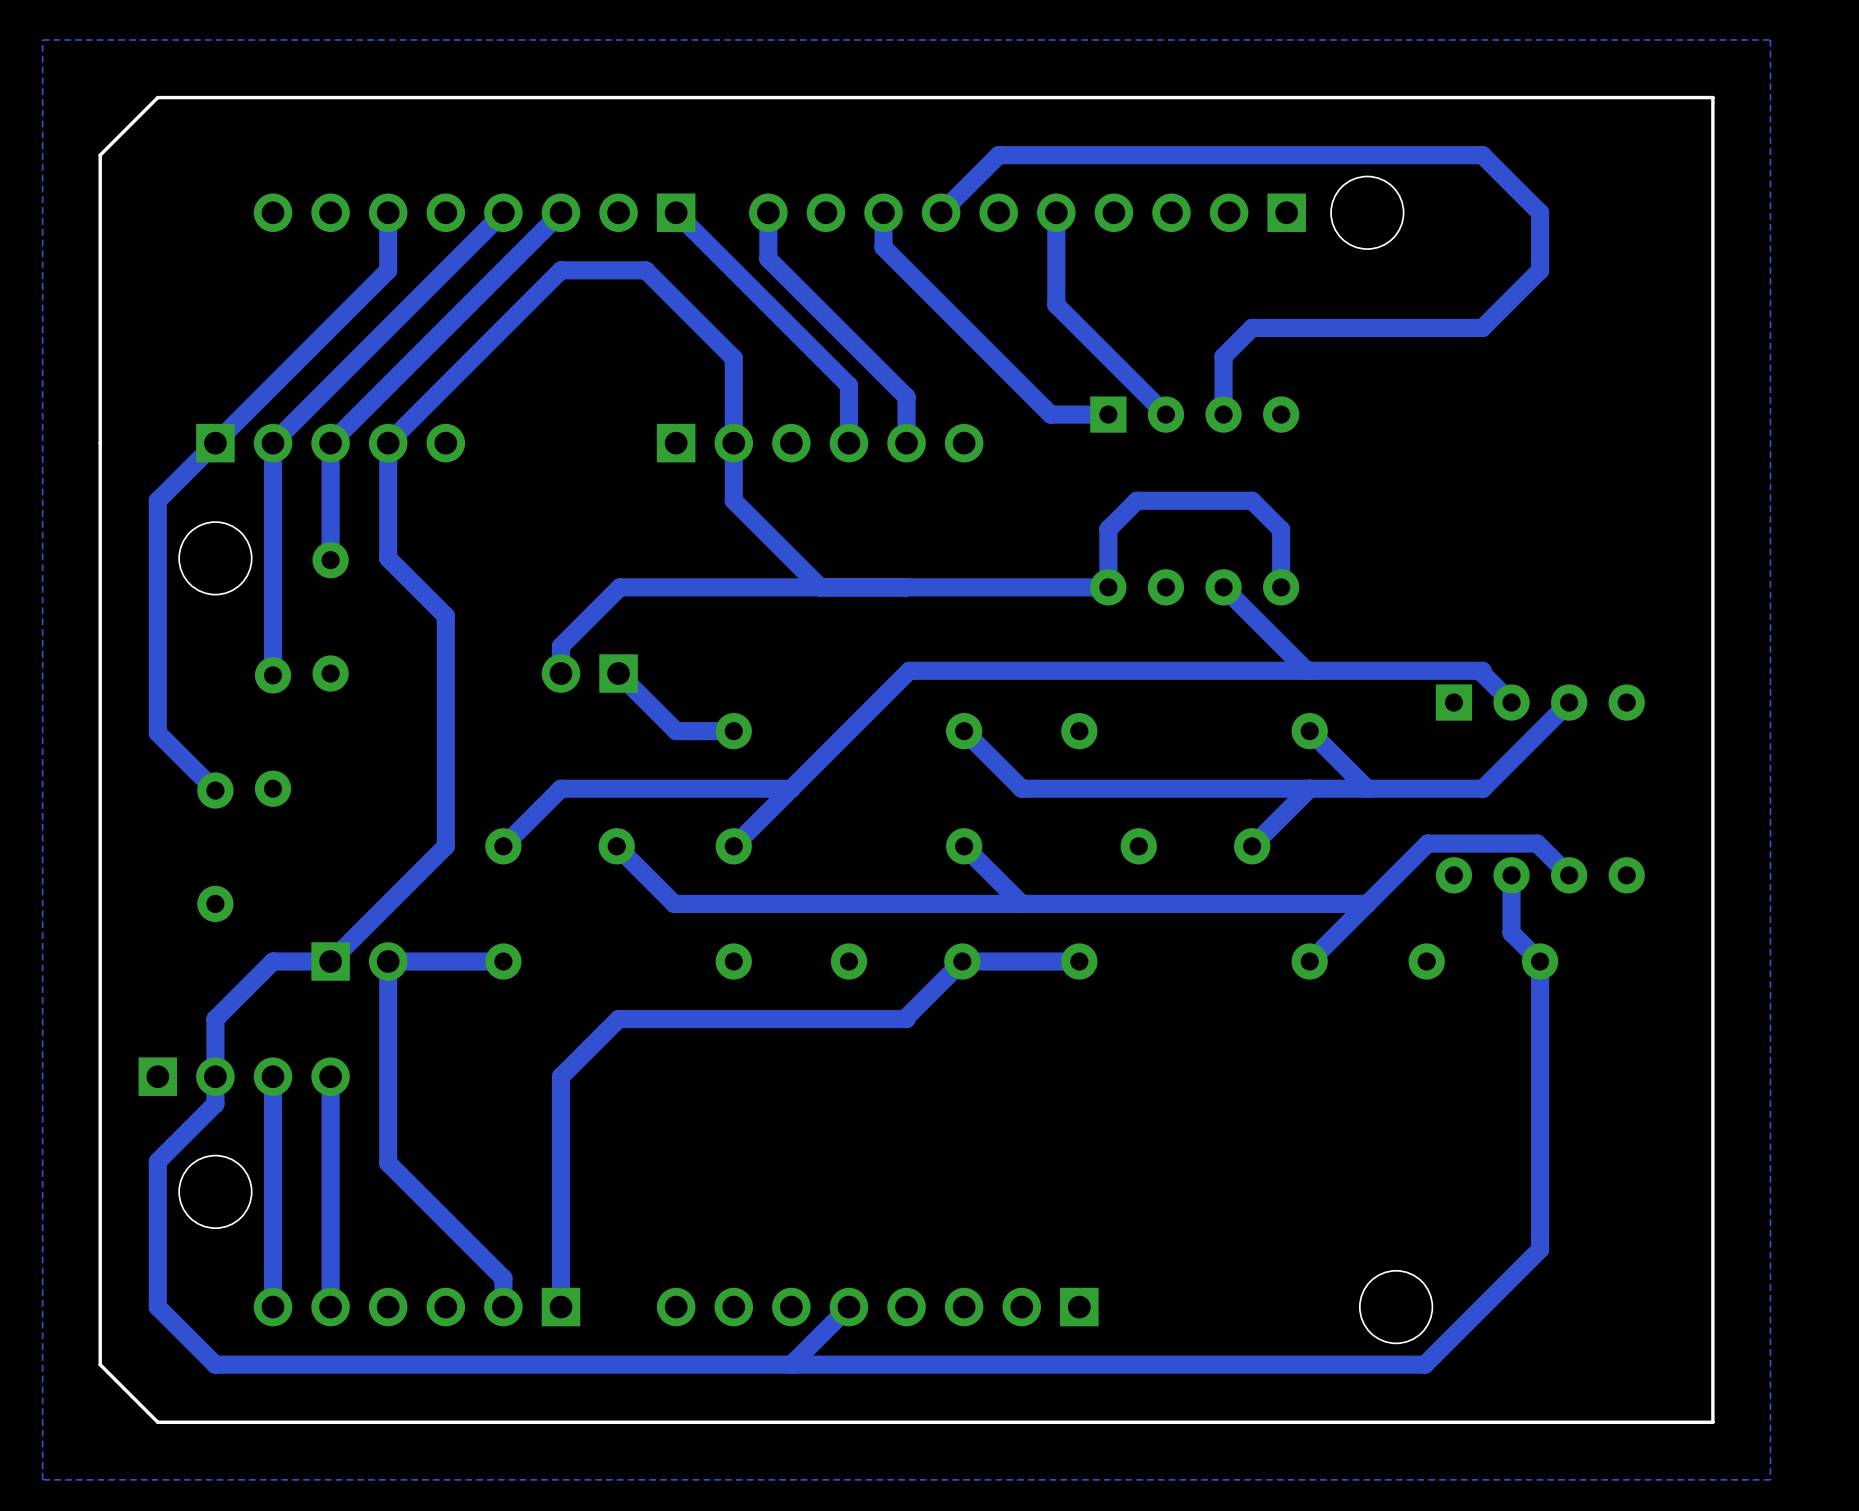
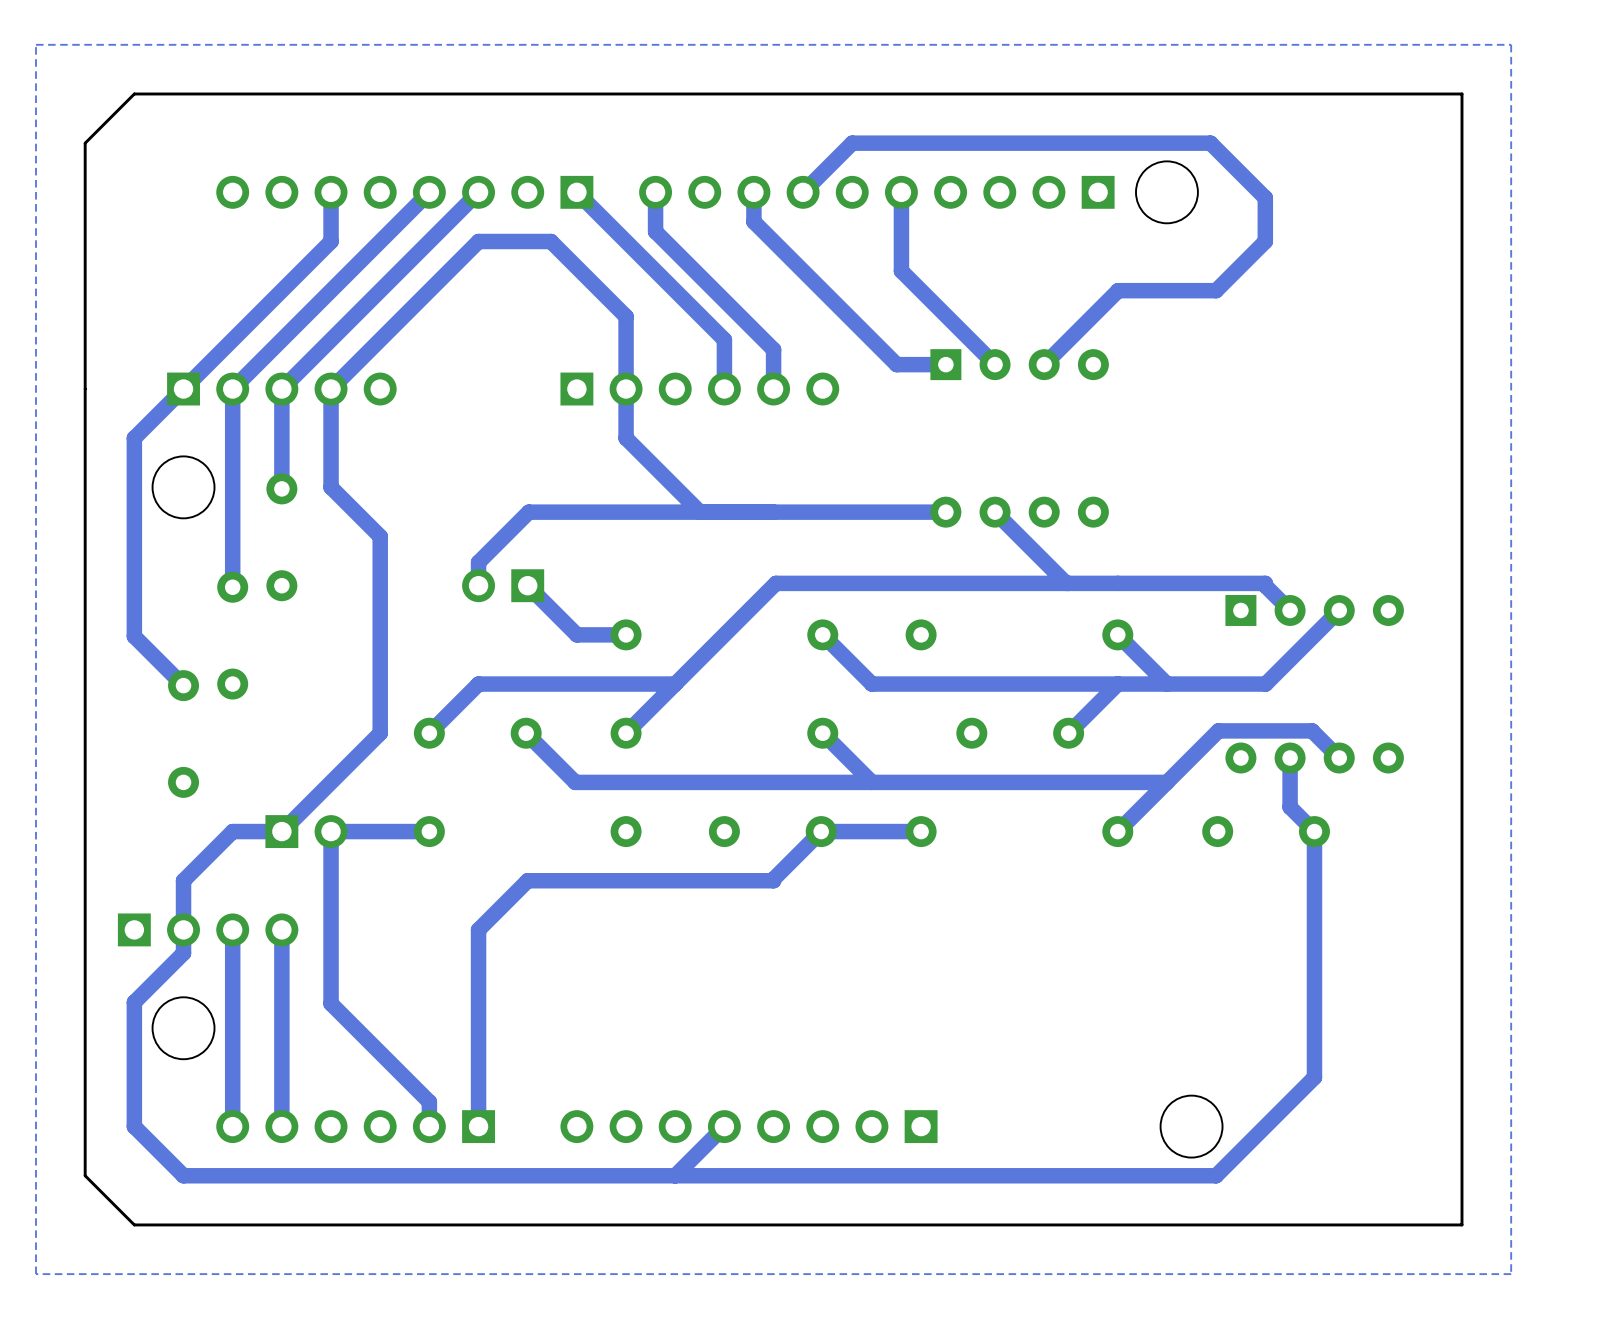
bottom track: (1418, 155) (1482, 155) (1540, 212) (1540, 270) (1482, 327) (1424, 327) -> (1210, 143) (1265, 197) (1265, 241) (1216, 290)
bottom track: (1310, 327) (1252, 327) (1223, 356) (1223, 414) (1229, 414) -> (1118, 290) (1044, 364)
bottom track: (1223, 587) (1307, 670) -> (995, 512) (1066, 583)
bottom track: (1281, 587) (1281, 529) (1252, 500) (1136, 500) (1108, 529) (1108, 587) -> none

